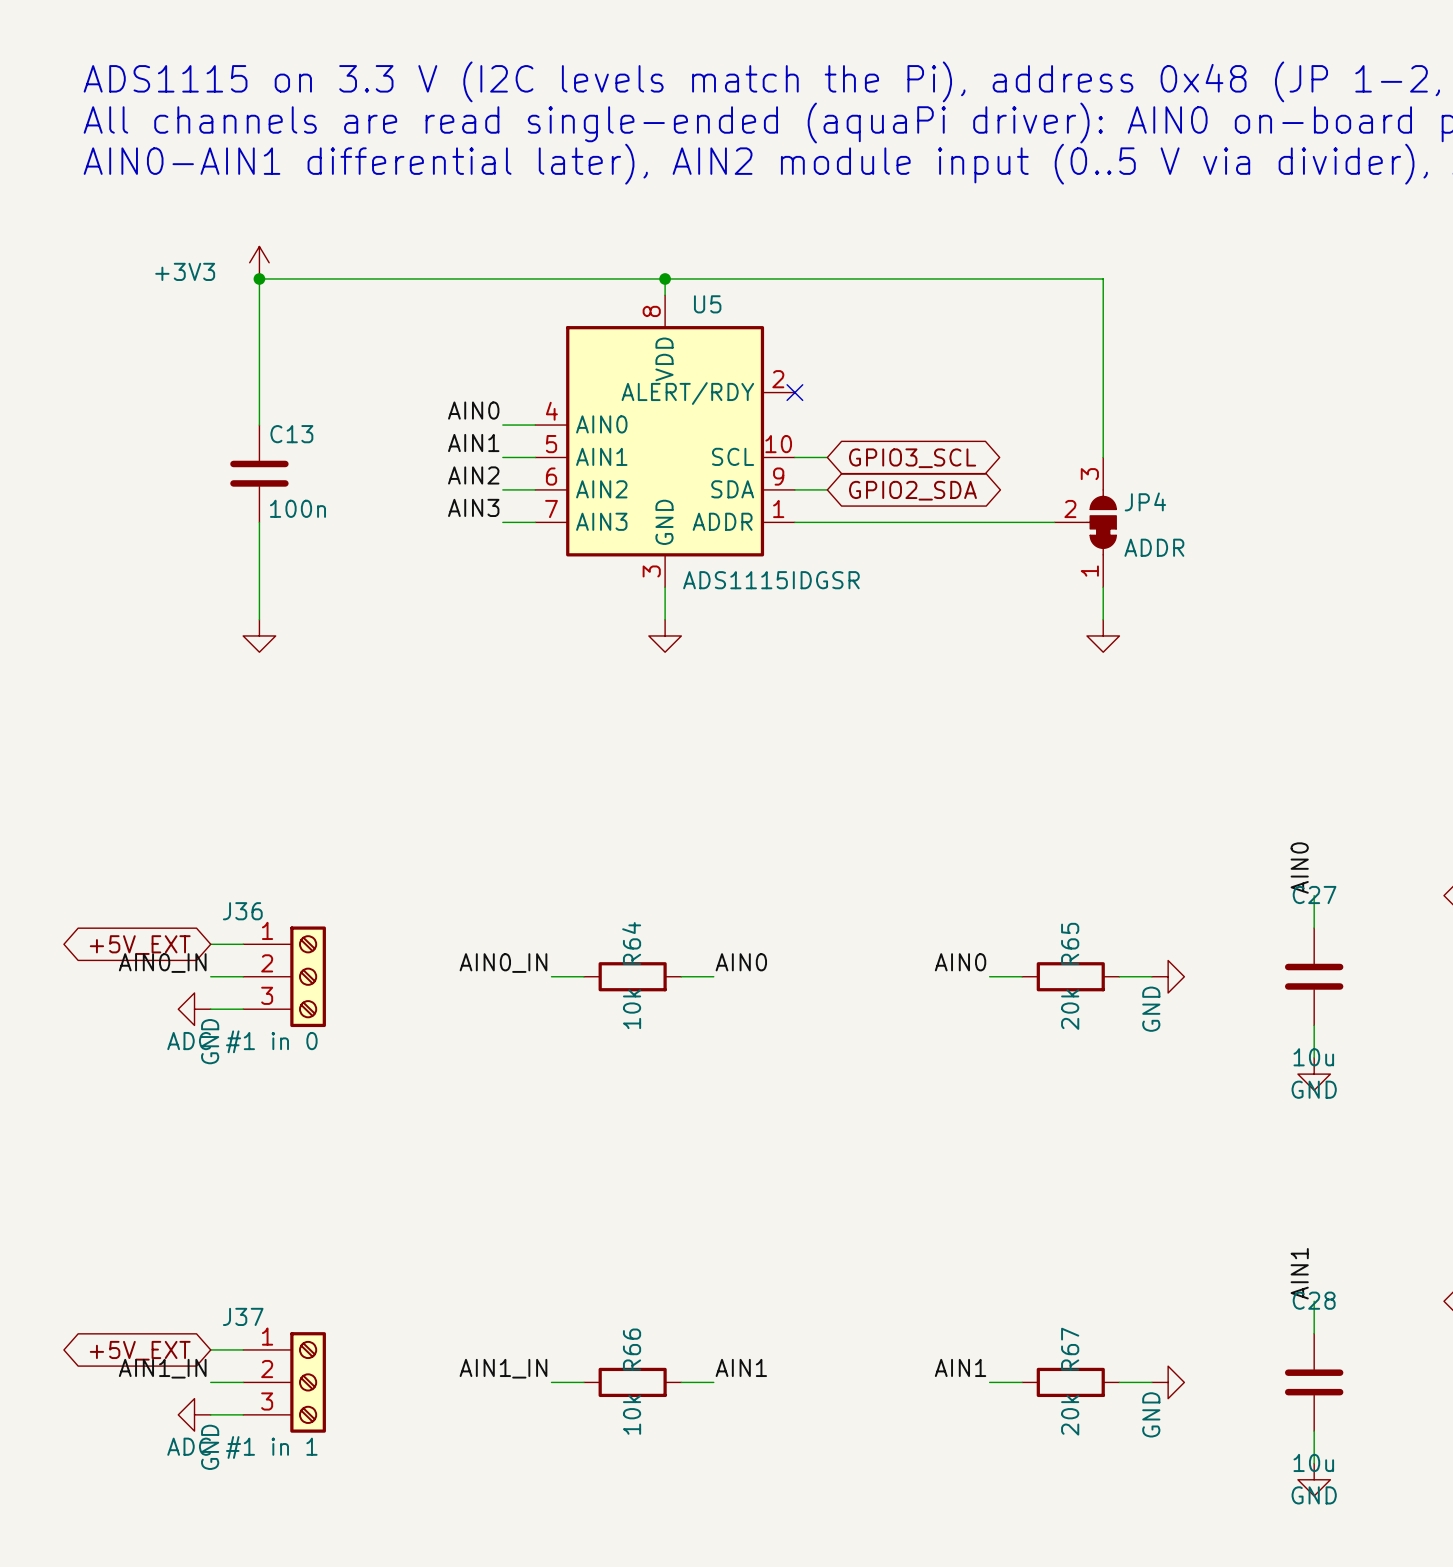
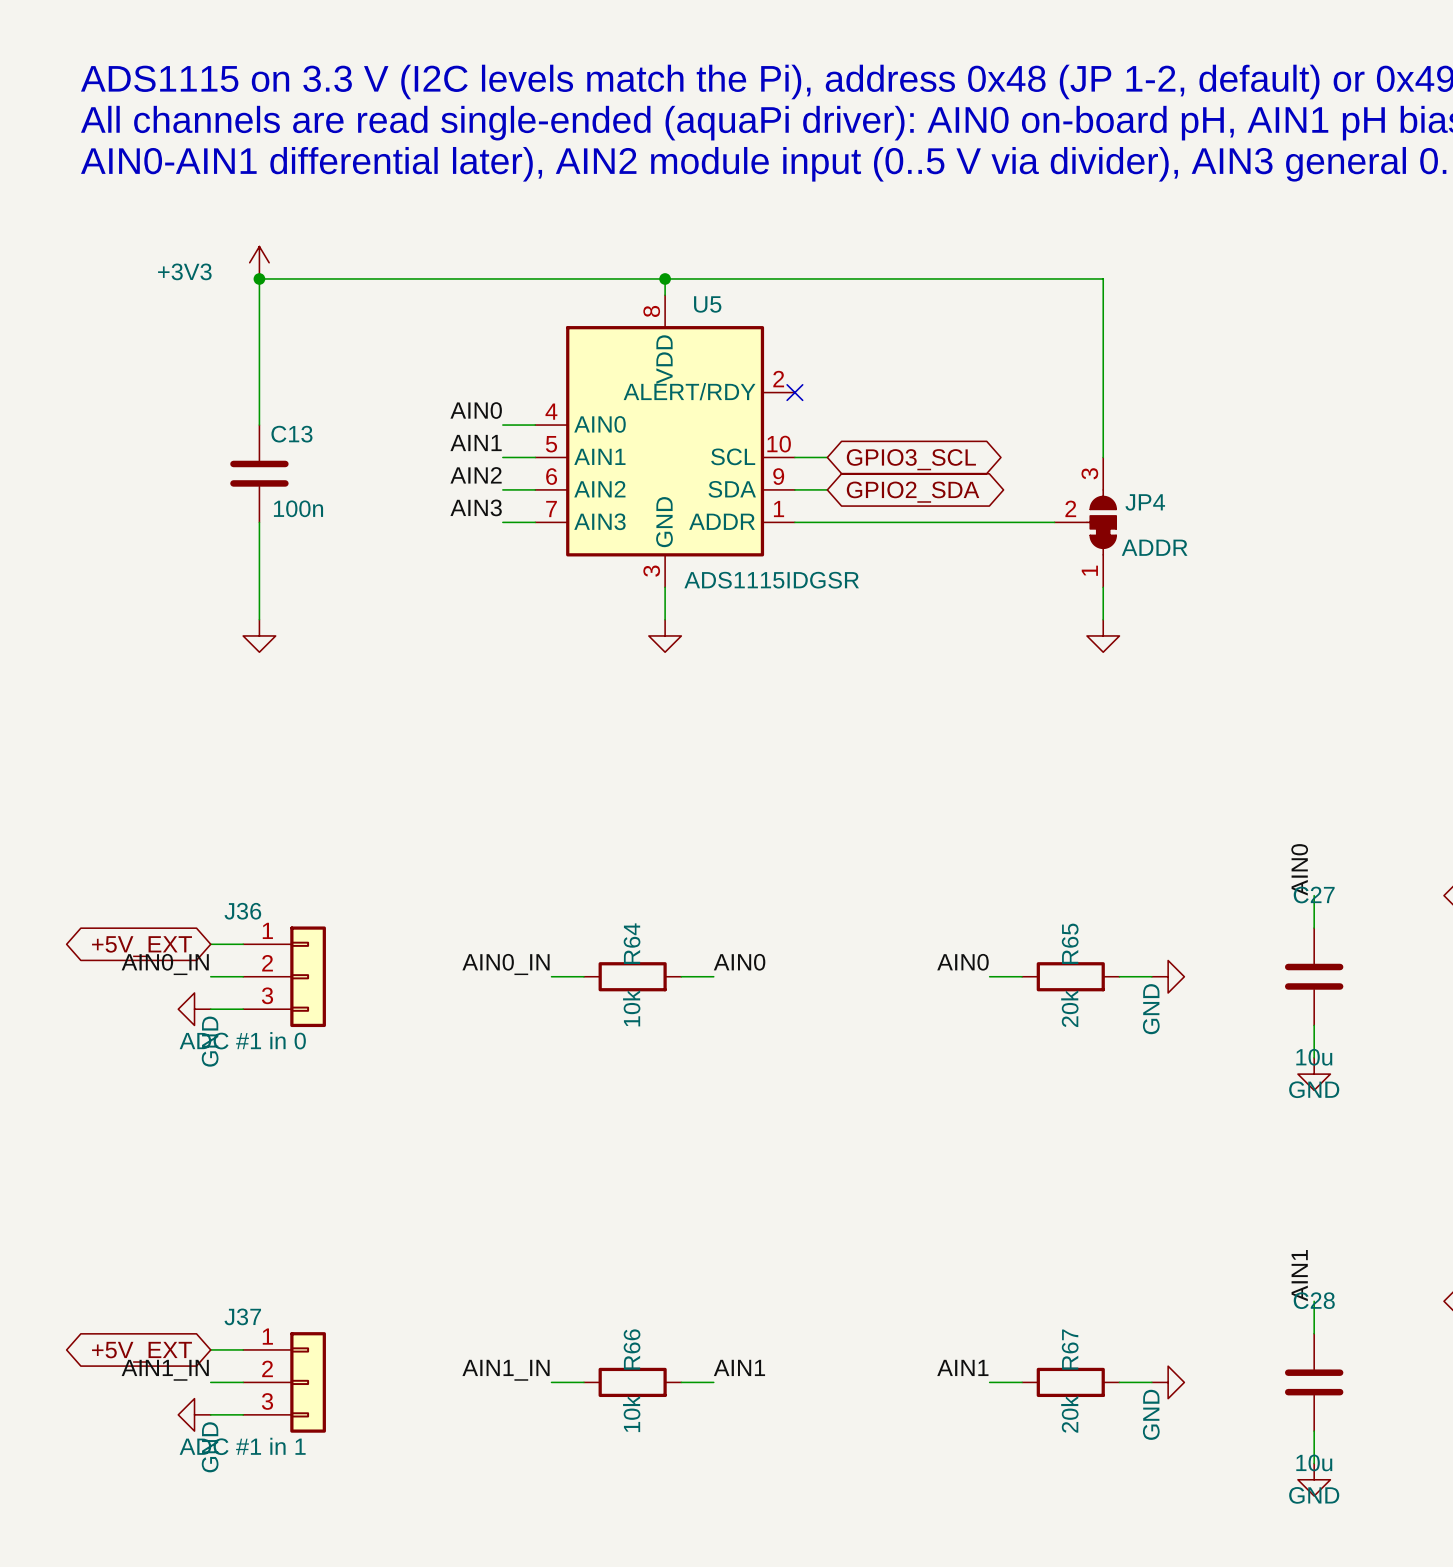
J36 symbol: [243, 926, 326, 1028] -> [243, 926, 326, 1028]
J37 symbol: [243, 1332, 326, 1433] -> [243, 1332, 326, 1433]

